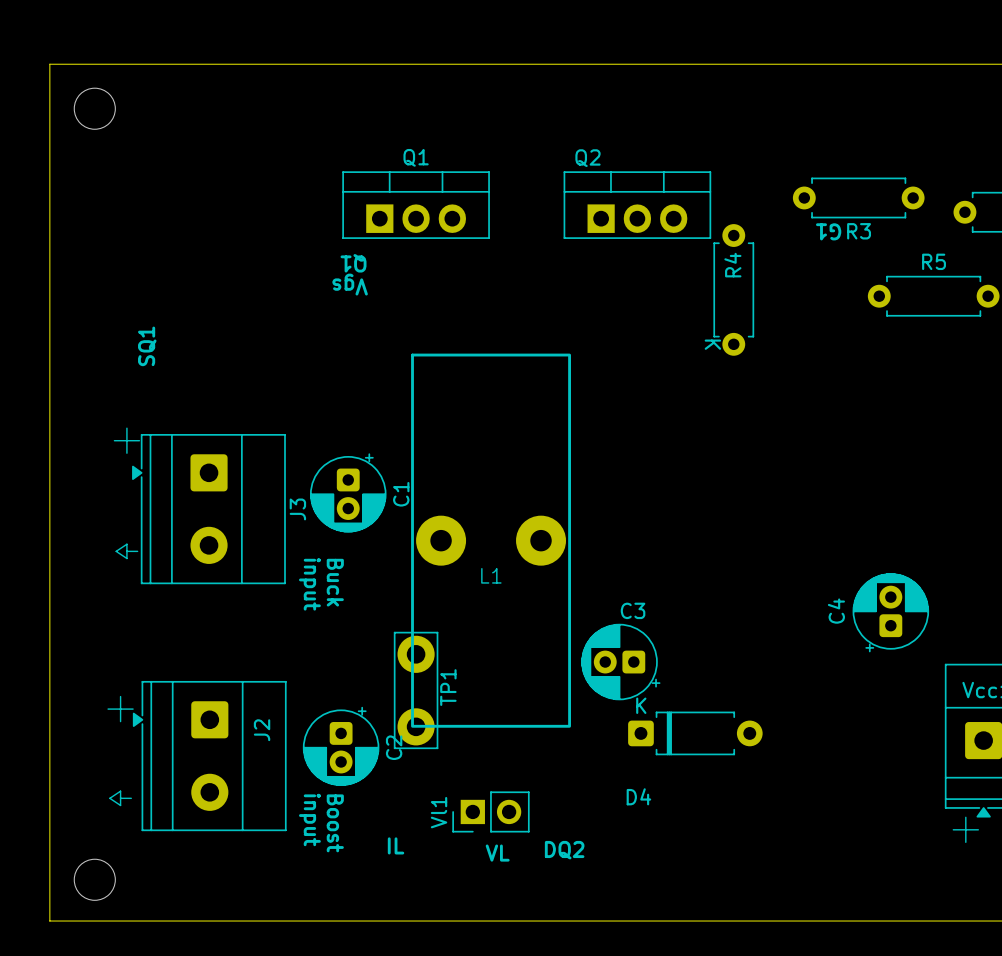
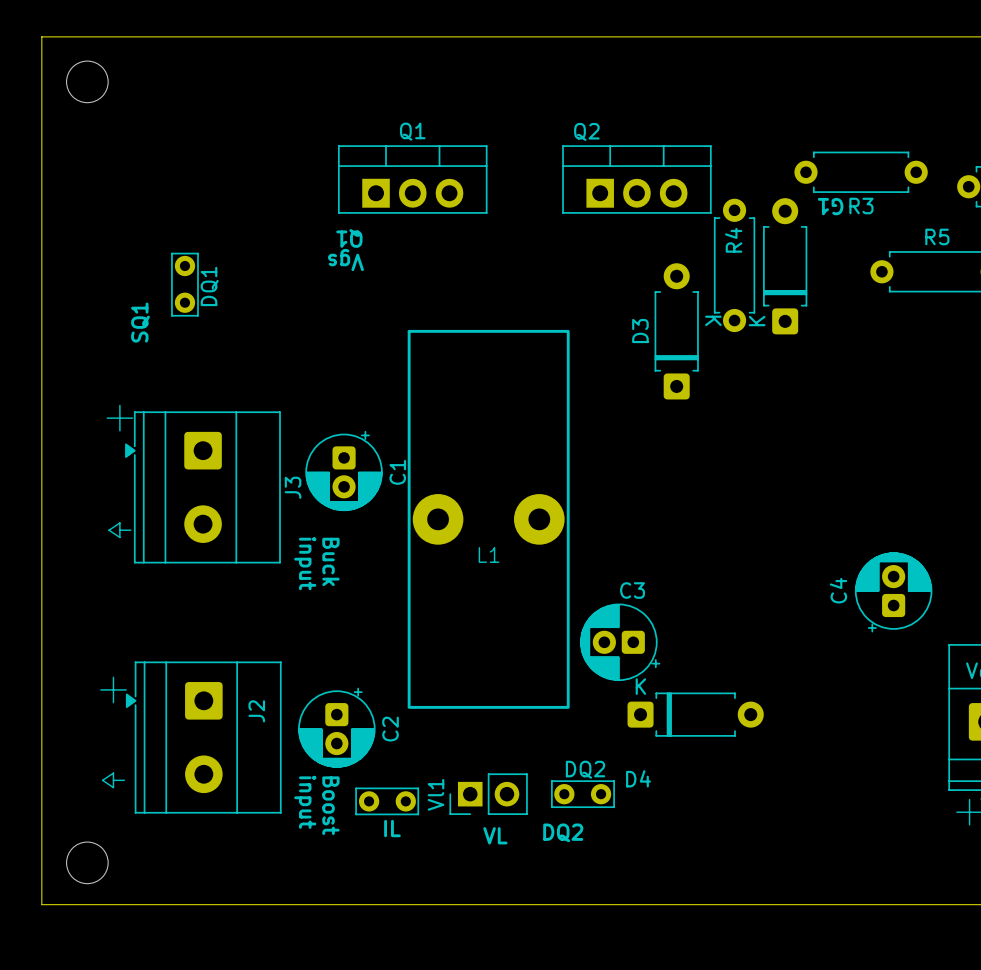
part: none -> (785, 266)
DQ1: none -> (184, 284)
D3: none -> (676, 331)
TP1: (416, 690) -> none
DQ2: none -> (582, 794)
part: none -> (387, 801)

